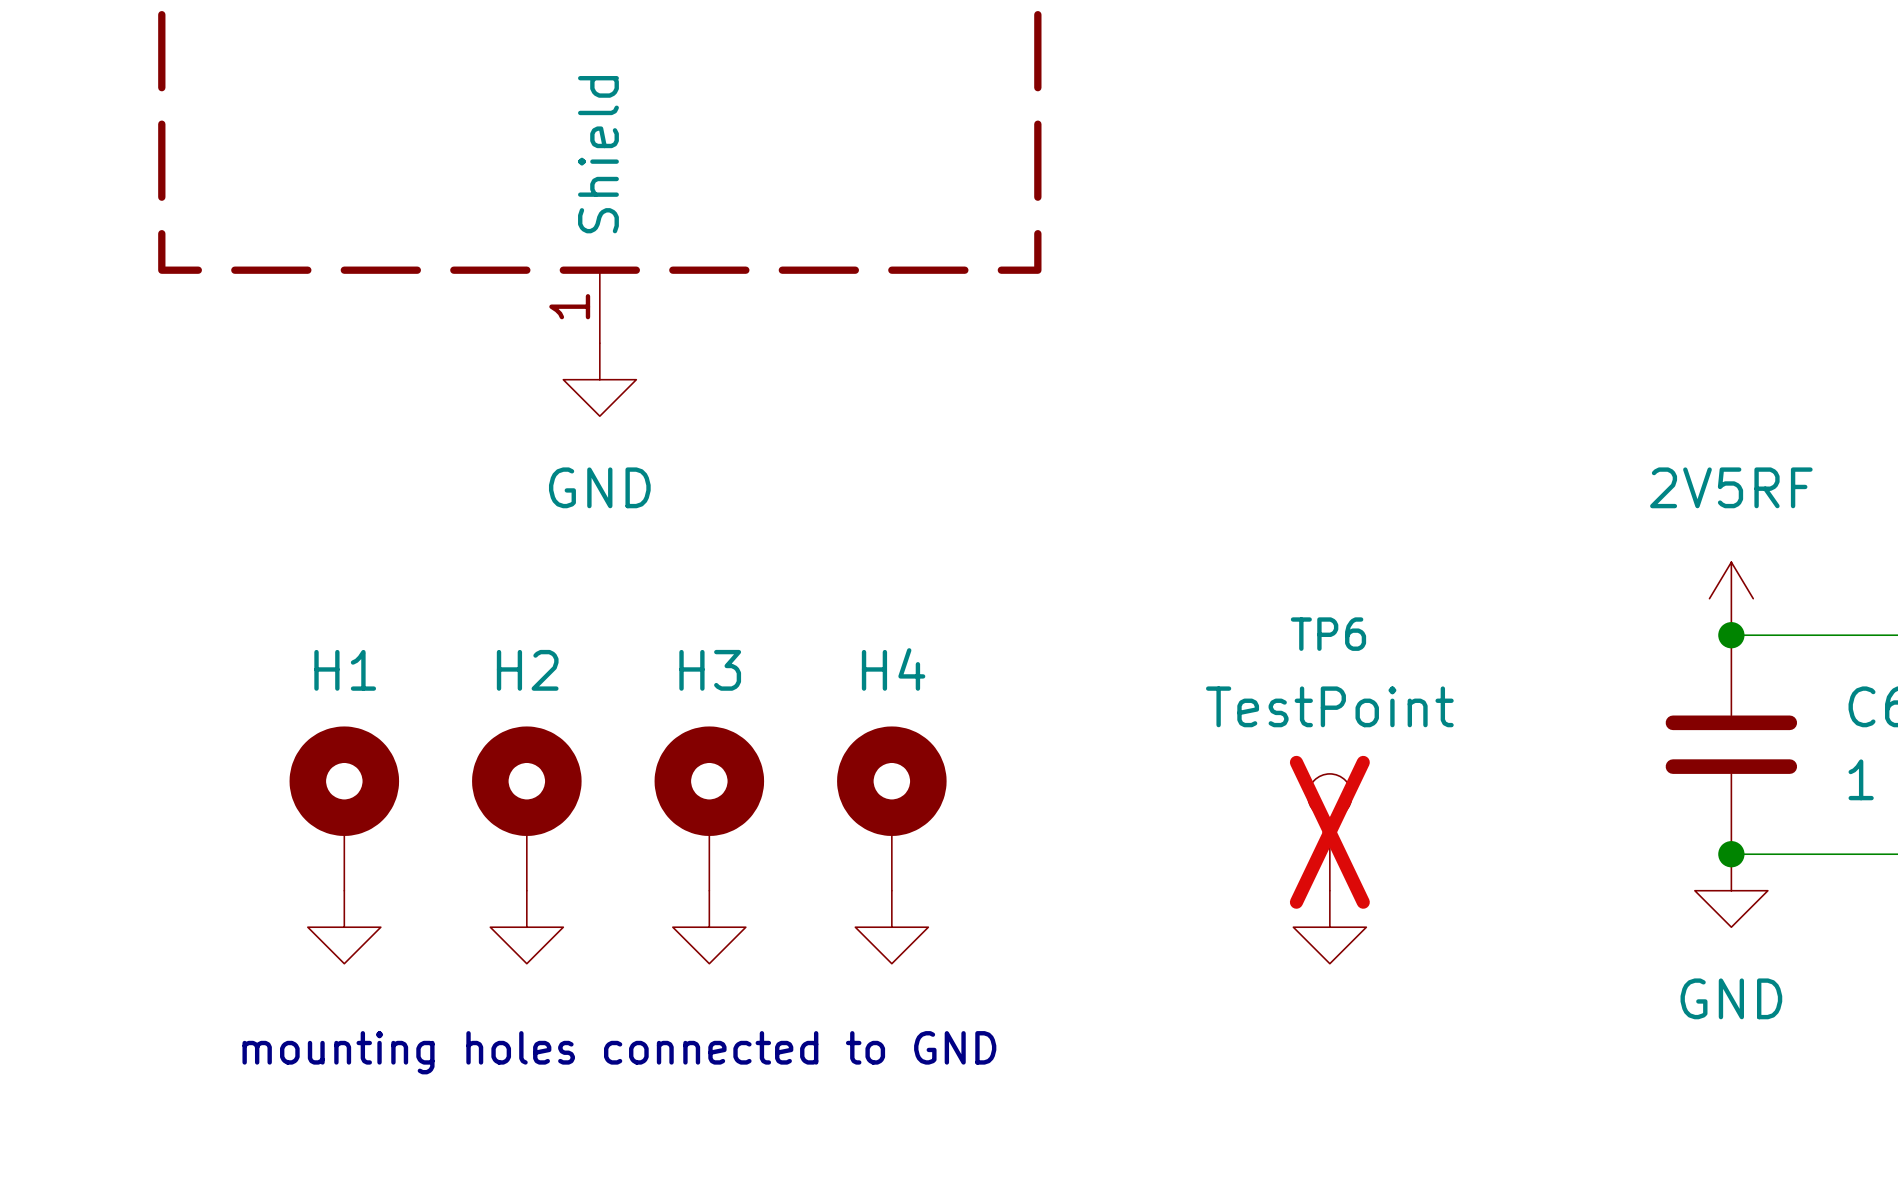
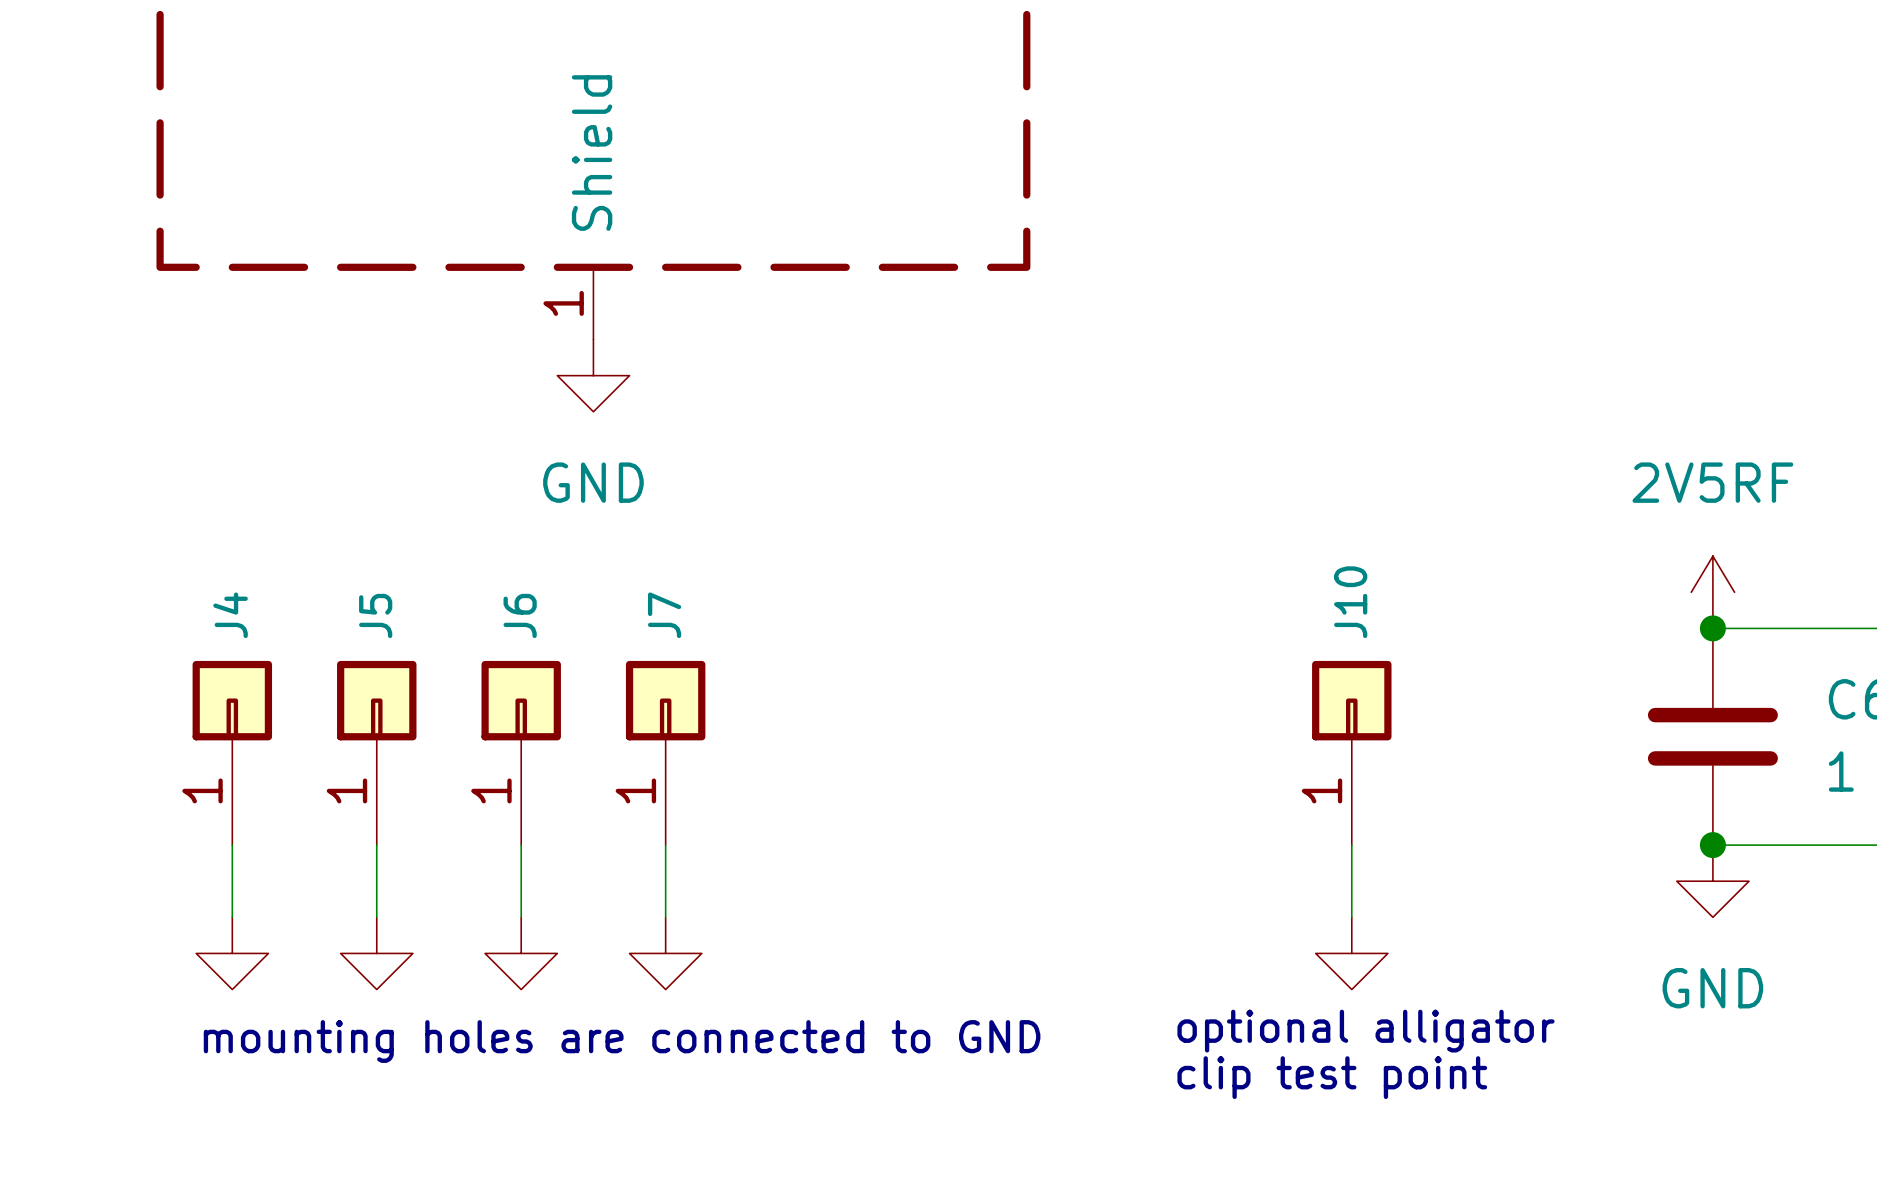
J4: none -> (232, 753)
J5: none -> (376, 753)
J6: none -> (521, 753)
J7: none -> (665, 753)
J10: none -> (1351, 753)
H1: (344, 808) -> none
H2: (526, 808) -> none
H3: (709, 808) -> none
H4: (891, 808) -> none
TP6: TestPoint (1329, 832) -> none
wire: none -> (232, 845) (232, 917)
wire: none -> (376, 845) (376, 917)
wire: none -> (665, 845) (665, 917)
wire: none -> (1351, 845) (1351, 917)
power symbol position: (344, 927) -> (376, 953)
power symbol position: (526, 927) -> (521, 953)
power symbol position: (709, 927) -> (665, 953)
power symbol: (891, 927) -> none
power symbol position: (1329, 927) -> (1351, 953)
power symbol: none -> (232, 953)
text: none -> optional alligator (1365, 1031)
text: mounting holes connected to GND (619, 1052) -> mounting holes are connected to GND (622, 1041)
text: none -> clip test point (1332, 1077)

